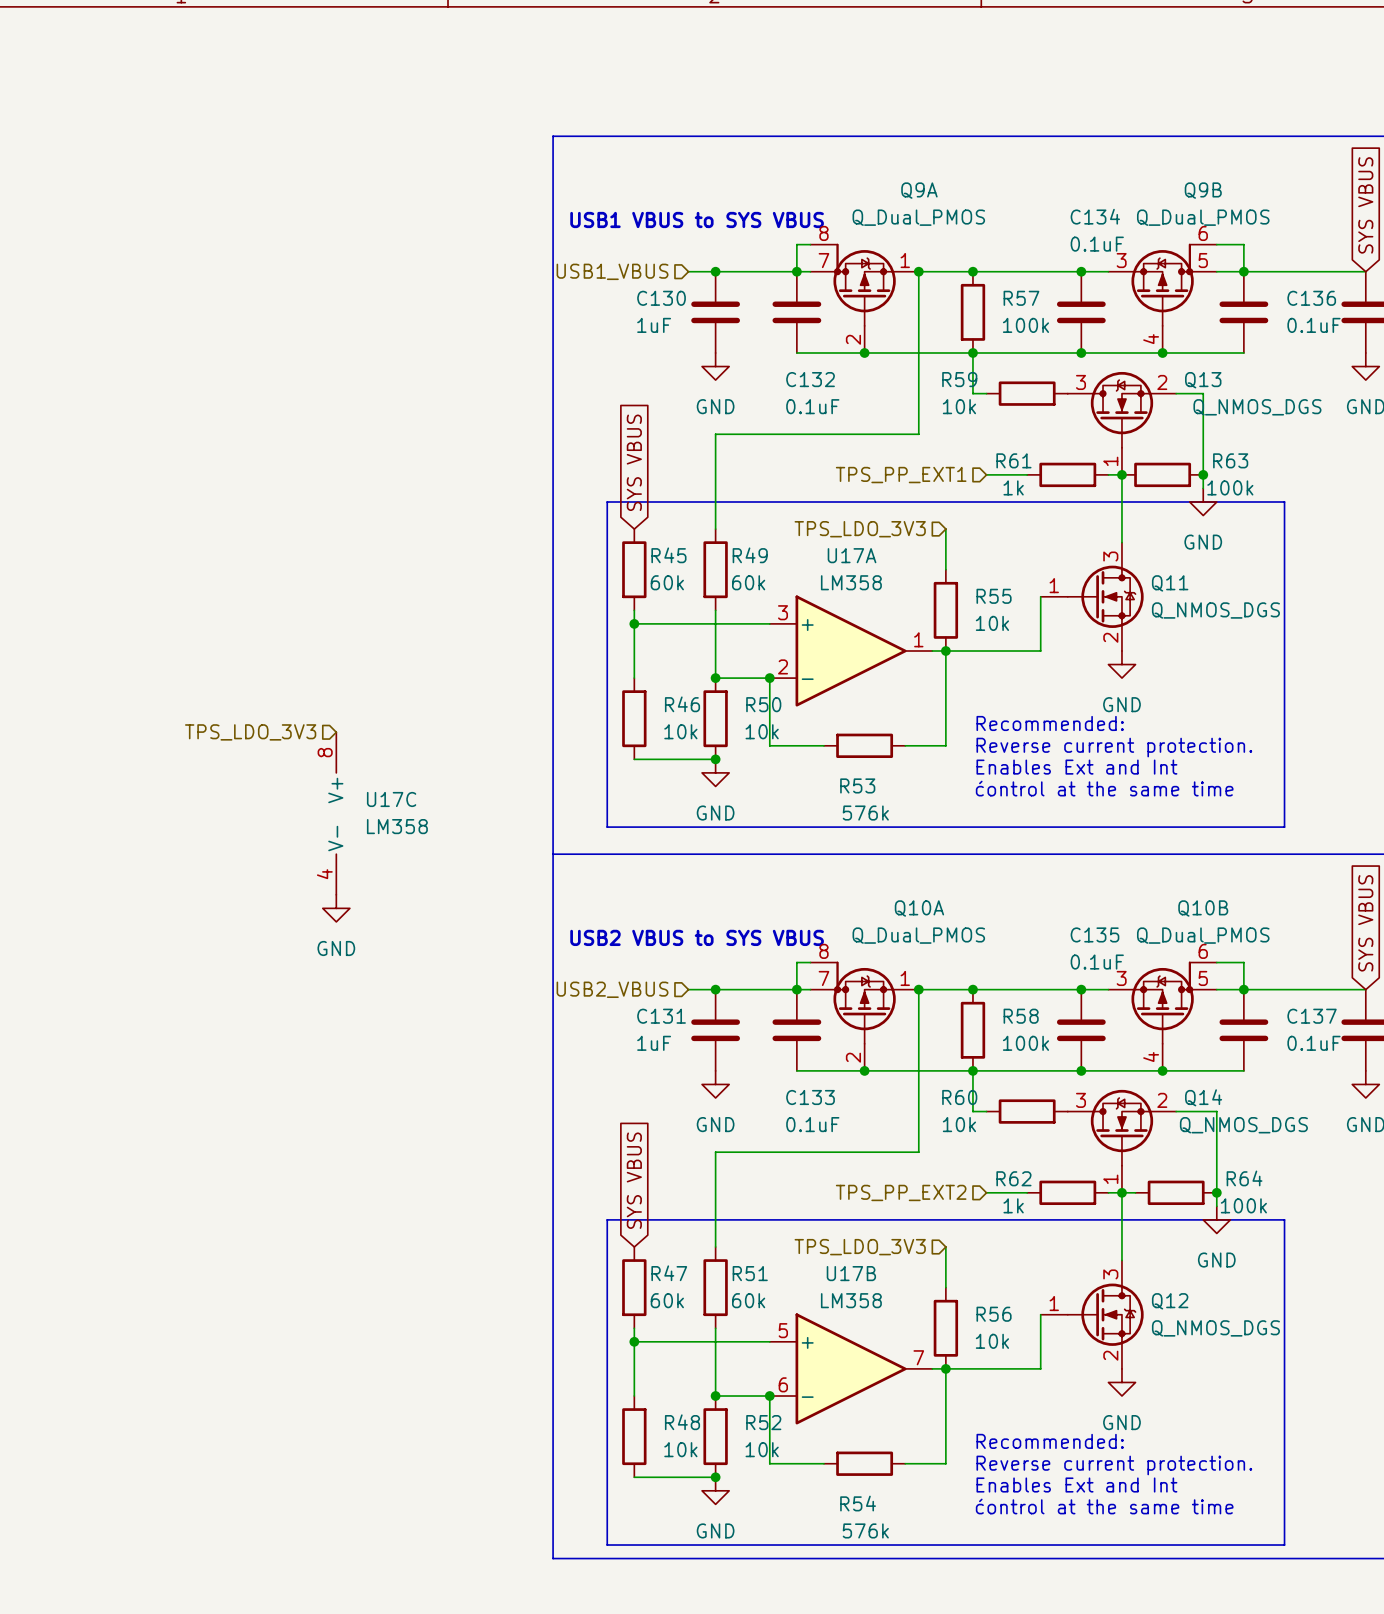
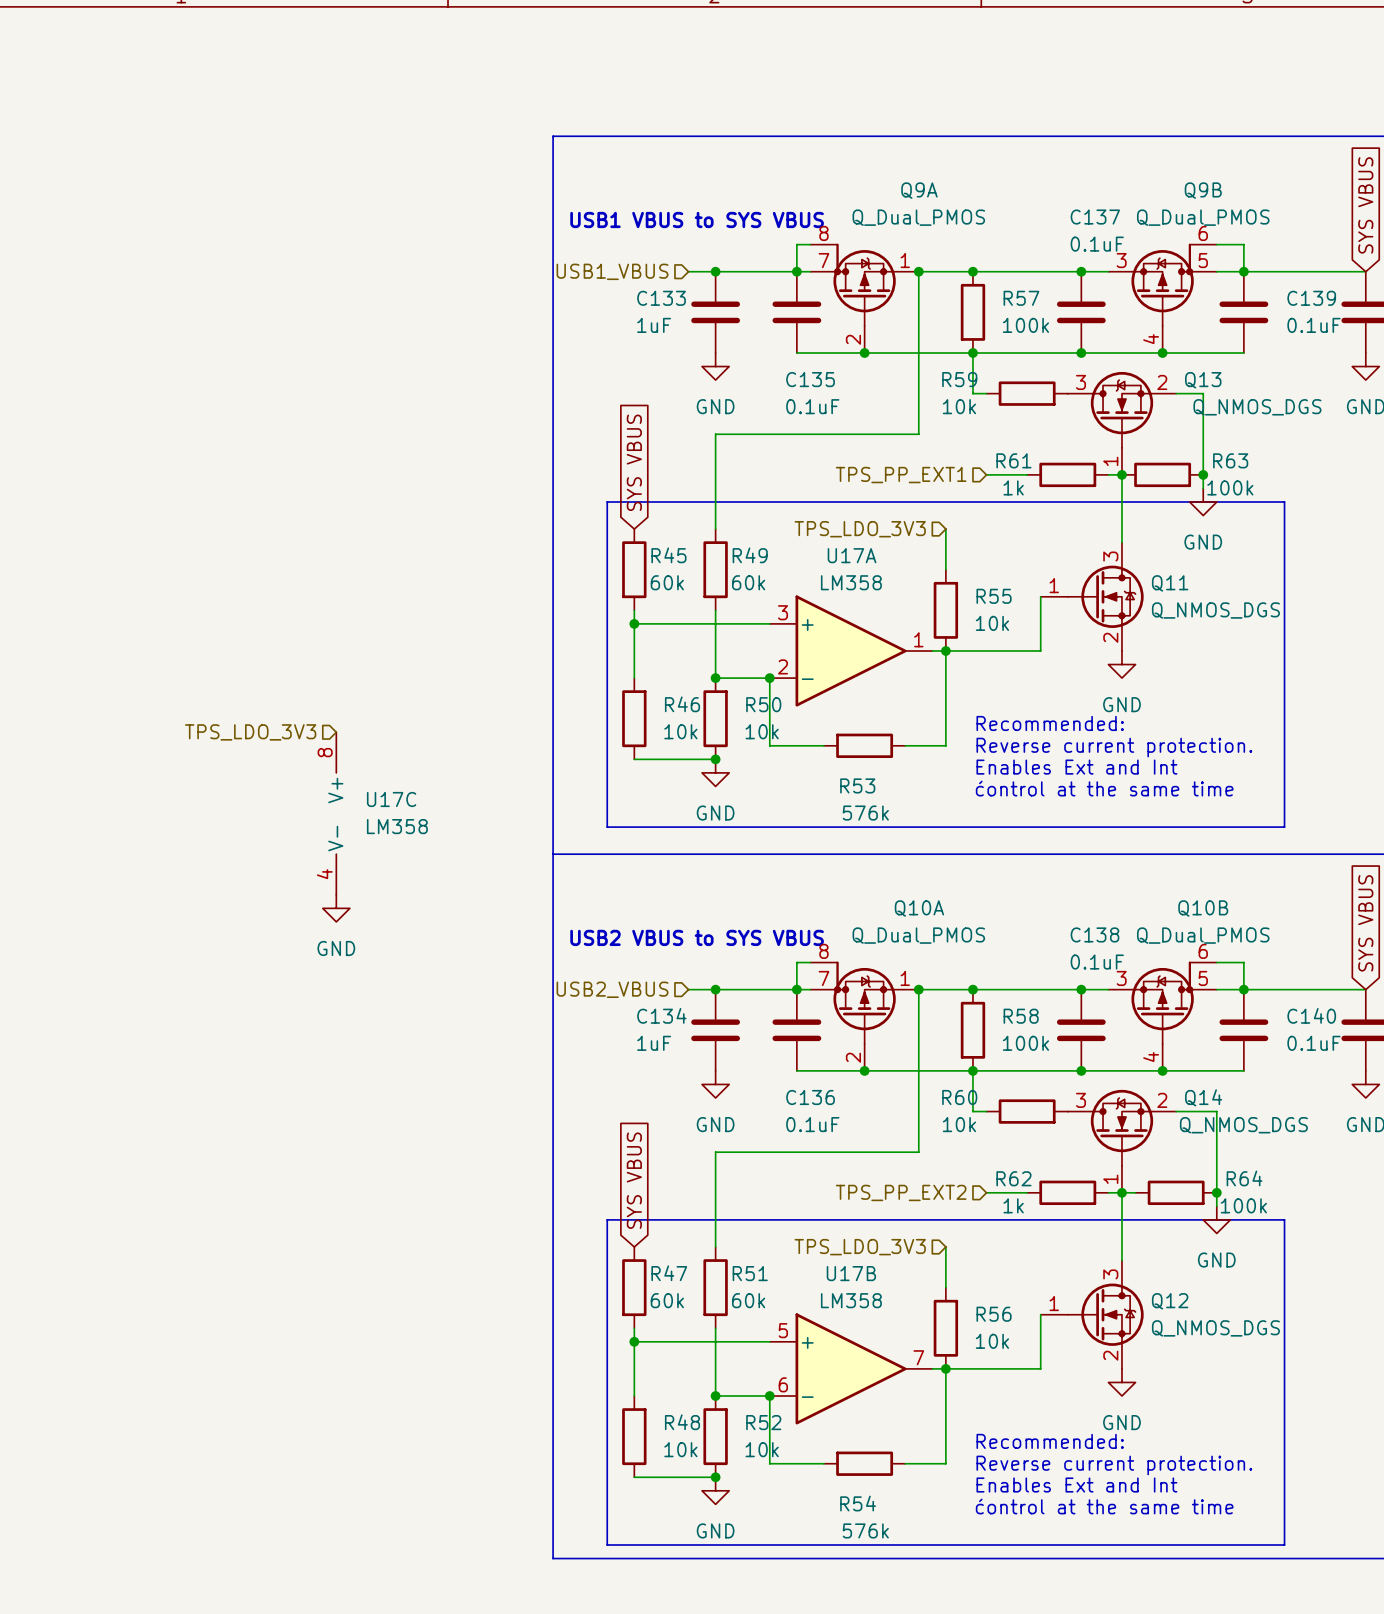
C134 name: C134 (1095, 216) -> C137 (1095, 217)
C130 name: C130 (661, 298) -> C133 (661, 298)
C136 name: C136 (1311, 298) -> C139 (1311, 298)
C132 name: C132 (810, 379) -> C135 (810, 379)
C135 name: C135 (1094, 934) -> C138 (1094, 934)
C131 name: C131 (661, 1016) -> C134 (661, 1015)
C137 name: C137 (1312, 1016) -> C140 (1311, 1015)
C133 name: C133 (810, 1097) -> C136 (810, 1097)

